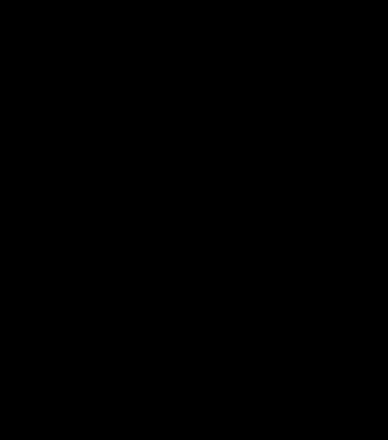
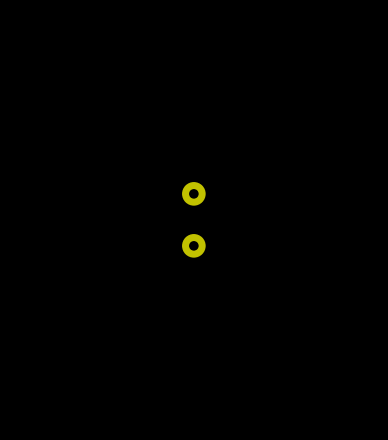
part: none -> (193, 219)

